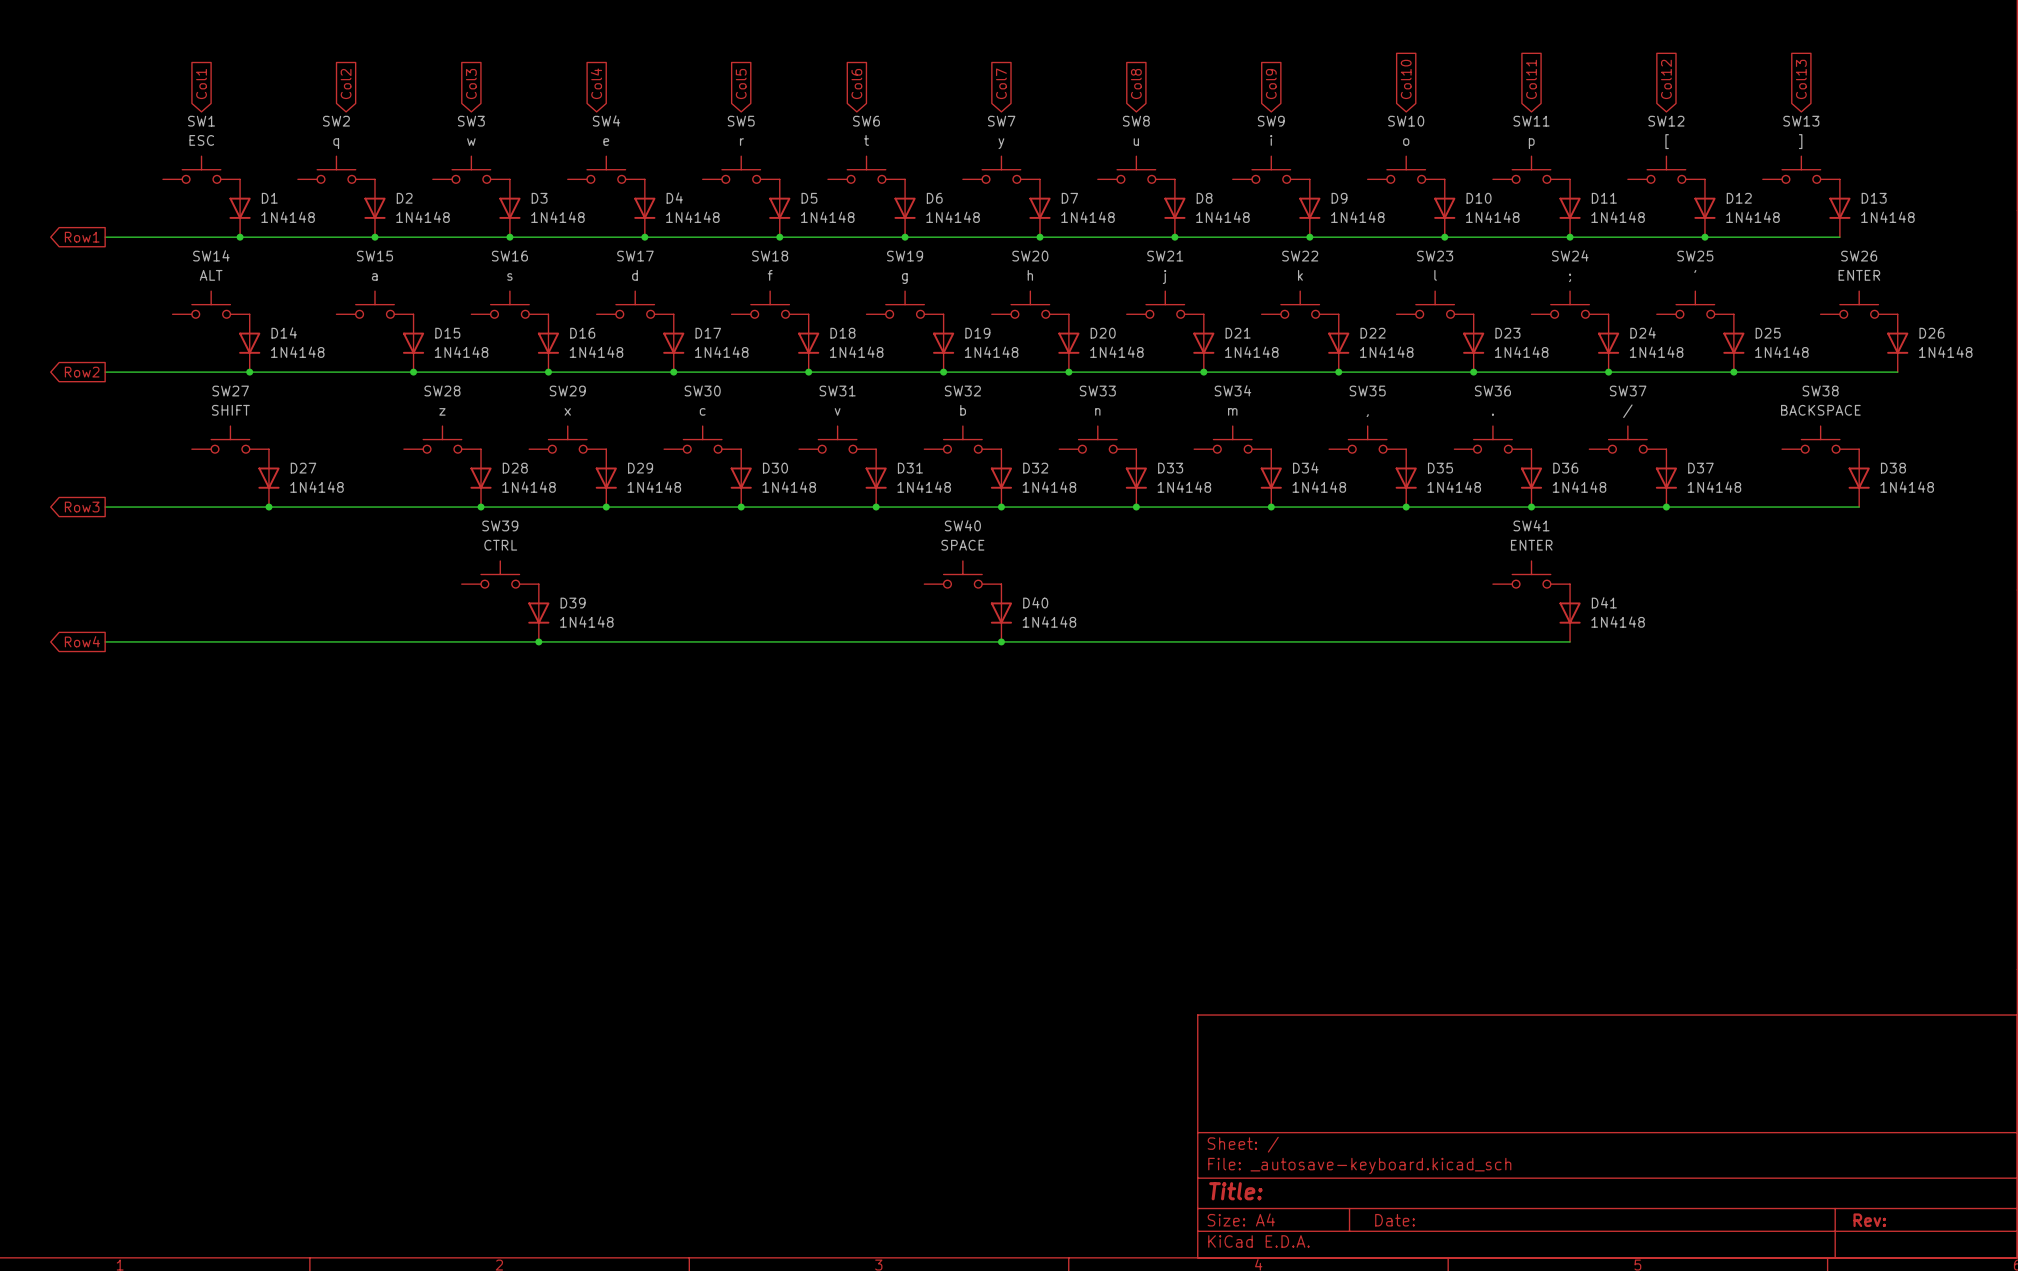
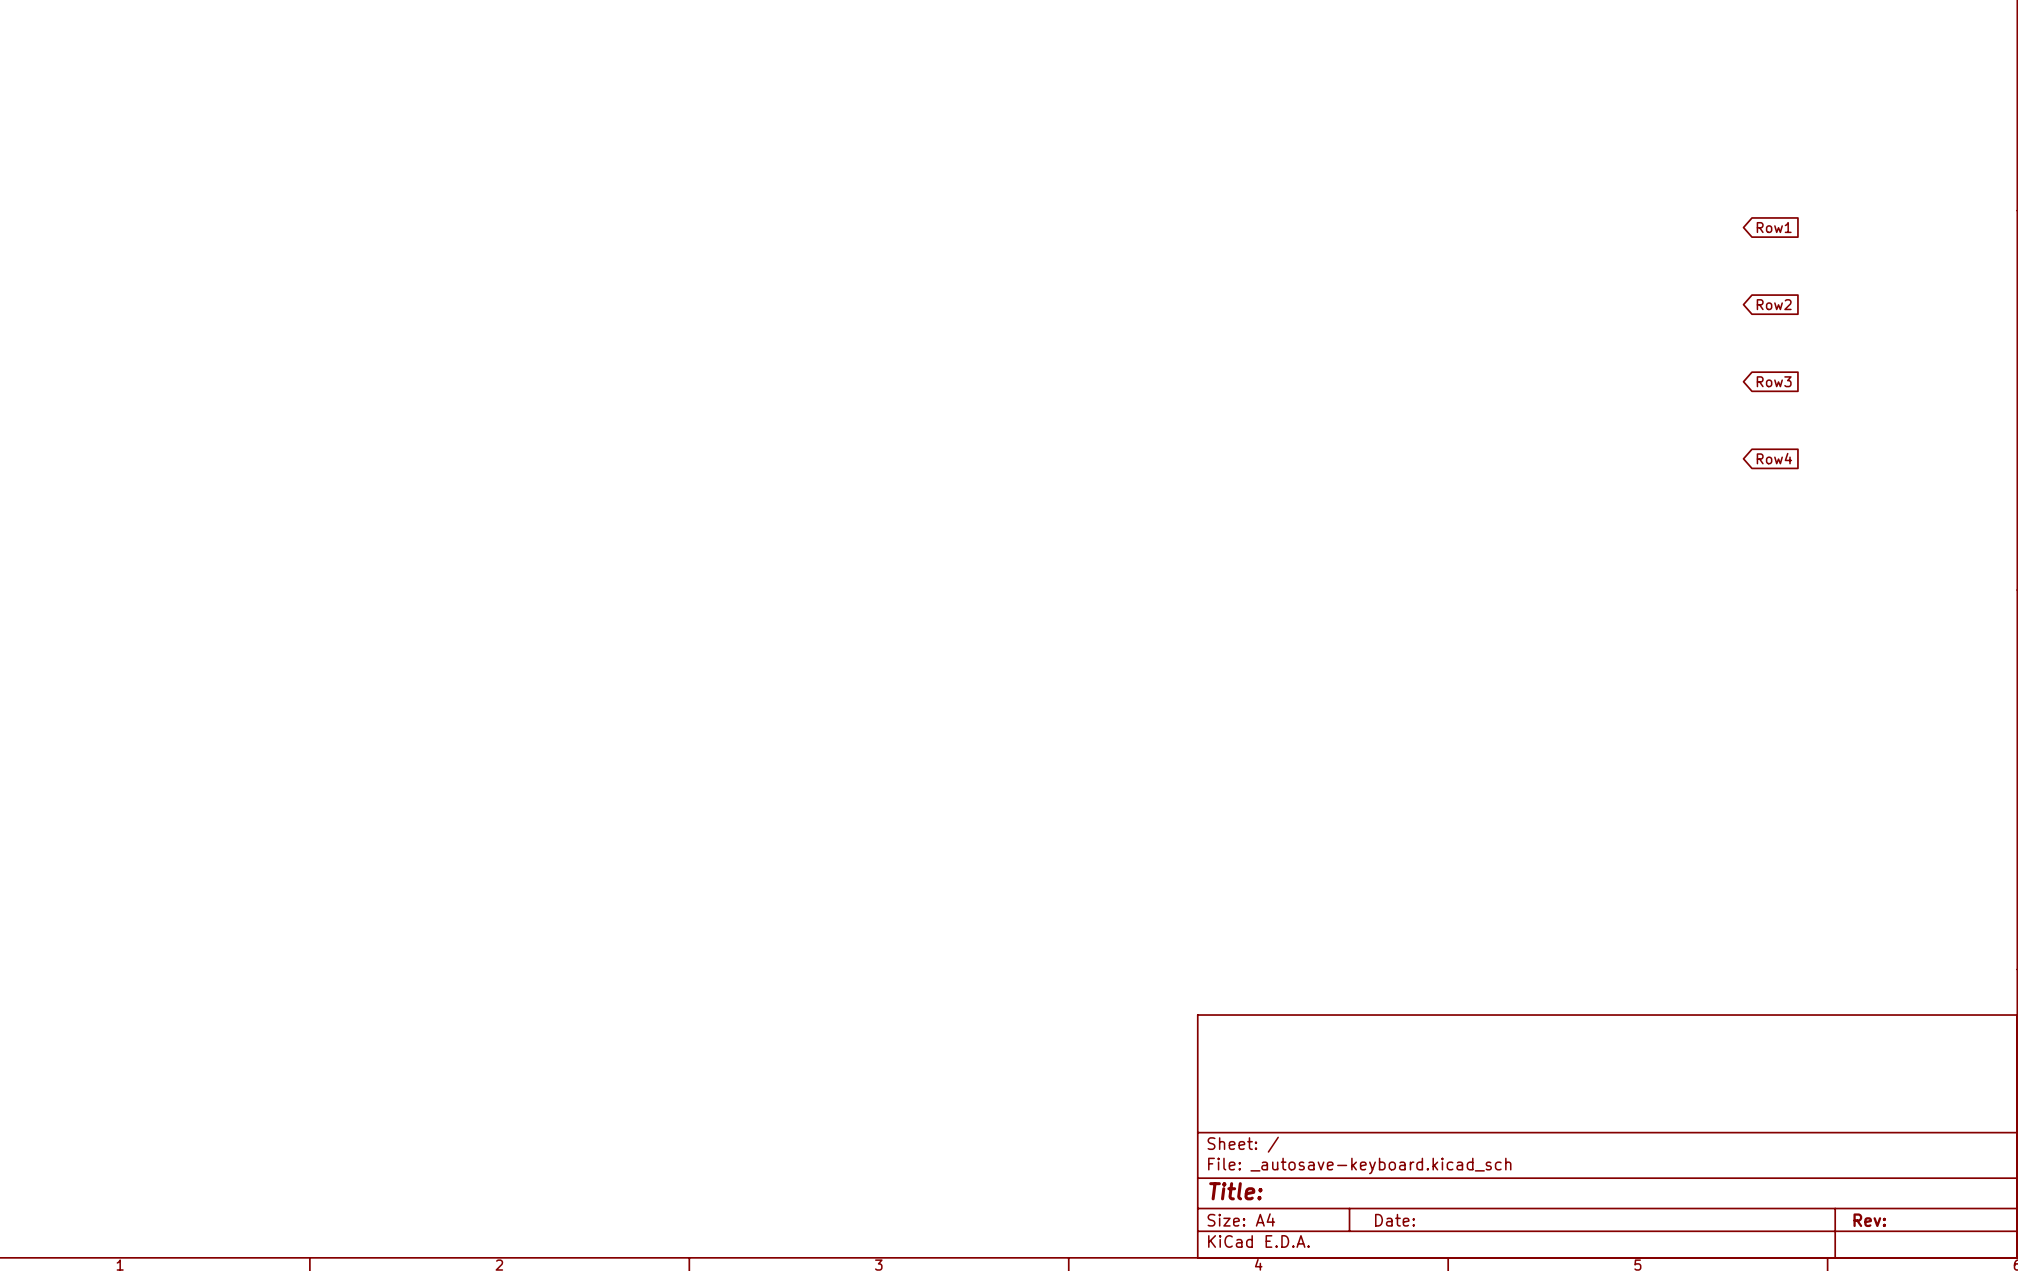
global label: Col10 (1406, 79) -> none
global label: Col11 (1531, 79) -> none
global label: Col12 (1666, 79) -> none
global label: Col13 (1801, 79) -> none
global label: Col1 (201, 83) -> none
global label: Col2 (346, 83) -> none
global label: Col3 (471, 83) -> none
global label: Col4 (596, 83) -> none
global label: Col5 (741, 83) -> none
global label: Col6 (856, 83) -> none
global label: Col7 (1001, 83) -> none
global label: Col8 (1136, 83) -> none
global label: Col9 (1271, 83) -> none
SW1: ESC (201, 169) -> none
SW2: q (336, 169) -> none
SW3: w (471, 169) -> none
SW4: e (606, 169) -> none
SW5: r (741, 169) -> none
SW6: t (866, 169) -> none
SW7: y (1001, 169) -> none
SW8: u (1136, 169) -> none
SW9: i (1271, 169) -> none
SW10: o (1406, 169) -> none
SW11: p (1531, 169) -> none
SW12: [ (1666, 169) -> none
SW13: ] (1801, 169) -> none
D1: 1N4148 (240, 208) -> none
D2: 1N4148 (374, 208) -> none
D3: 1N4148 (509, 208) -> none
D4: 1N4148 (644, 208) -> none
D5: 1N4148 (779, 208) -> none
D6: 1N4148 (905, 208) -> none
D7: 1N4148 (1039, 208) -> none
D8: 1N4148 (1174, 208) -> none
D9: 1N4148 (1309, 208) -> none
D10: 1N4148 (1444, 208) -> none
D11: 1N4148 (1570, 208) -> none
D12: 1N4148 (1704, 208) -> none
D13: 1N4148 (1839, 208) -> none
global label: none -> Row1 (1774, 227)
global label: Row1 (82, 237) -> none
wire: (105, 237) (1839, 237) -> none
junction: (240, 237) -> none
junction: (374, 237) -> none
junction: (509, 237) -> none
junction: (644, 237) -> none
junction: (779, 237) -> none
junction: (905, 237) -> none
junction: (1039, 237) -> none
junction: (1174, 237) -> none
junction: (1309, 237) -> none
junction: (1444, 237) -> none
junction: (1570, 237) -> none
junction: (1704, 237) -> none
SW14: ALT (211, 304) -> none
SW15: a (374, 304) -> none
SW16: s (509, 304) -> none
SW17: d (635, 304) -> none
SW18: f (770, 304) -> none
SW19: g (905, 304) -> none
SW20: h (1030, 304) -> none
SW21: j (1165, 304) -> none
SW22: k (1300, 304) -> none
SW23: l (1435, 304) -> none
SW24: ; (1570, 304) -> none
SW25: ' (1695, 304) -> none
global label: none -> Row2 (1774, 304)
SW26: ENTER (1859, 304) -> none
D14: 1N4148 (249, 343) -> none
D15: 1N4148 (413, 343) -> none
D16: 1N4148 (548, 343) -> none
D17: 1N4148 (673, 343) -> none
D18: 1N4148 (808, 343) -> none
D19: 1N4148 (943, 343) -> none
D20: 1N4148 (1068, 343) -> none
D21: 1N4148 (1203, 343) -> none
D22: 1N4148 (1338, 343) -> none
D23: 1N4148 (1473, 343) -> none
D24: 1N4148 (1608, 343) -> none
D25: 1N4148 (1733, 343) -> none
D26: 1N4148 (1897, 343) -> none
global label: Row2 (82, 372) -> none
wire: (105, 372) (1897, 372) -> none
junction: (249, 372) -> none
junction: (413, 372) -> none
junction: (548, 372) -> none
junction: (673, 372) -> none
junction: (808, 372) -> none
junction: (943, 372) -> none
junction: (1068, 372) -> none
junction: (1203, 372) -> none
junction: (1338, 372) -> none
junction: (1473, 372) -> none
junction: (1608, 372) -> none
junction: (1733, 372) -> none
global label: none -> Row3 (1774, 381)
SW27: SHIFT (230, 439) -> none
SW28: z (442, 439) -> none
SW29: x (567, 439) -> none
SW30: c (702, 439) -> none
SW31: v (837, 439) -> none
SW32: b (962, 439) -> none
SW33: n (1097, 439) -> none
SW34: m (1232, 439) -> none
SW35: , (1367, 439) -> none
SW36: . (1492, 439) -> none
SW37: / (1627, 439) -> none
SW38: BACKSPACE (1820, 439) -> none
global label: none -> Row4 (1774, 458)
D27: 1N4148 (268, 478) -> none
D28: 1N4148 (481, 478) -> none
D29: 1N4148 (606, 478) -> none
D30: 1N4148 (741, 478) -> none
D31: 1N4148 (876, 478) -> none
D32: 1N4148 (1001, 478) -> none
D33: 1N4148 (1136, 478) -> none
D34: 1N4148 (1271, 478) -> none
D35: 1N4148 (1406, 478) -> none
D36: 1N4148 (1531, 478) -> none
D37: 1N4148 (1666, 478) -> none
D38: 1N4148 (1859, 478) -> none
global label: Row3 (82, 507) -> none
wire: (105, 507) (1859, 507) -> none
junction: (268, 507) -> none
junction: (481, 507) -> none
junction: (606, 507) -> none
junction: (741, 507) -> none
junction: (876, 507) -> none
junction: (1001, 507) -> none
junction: (1136, 507) -> none
junction: (1271, 507) -> none
junction: (1406, 507) -> none
junction: (1531, 507) -> none
junction: (1666, 507) -> none
SW39: CTRL (500, 574) -> none
SW40: SPACE (962, 574) -> none
SW41: ENTER (1531, 574) -> none
D39: 1N4148 (538, 613) -> none
D40: 1N4148 (1001, 613) -> none
D41: 1N4148 (1570, 613) -> none
global label: Row4 (82, 641) -> none
wire: (105, 641) (1570, 641) -> none
junction: (538, 641) -> none
junction: (1001, 641) -> none

